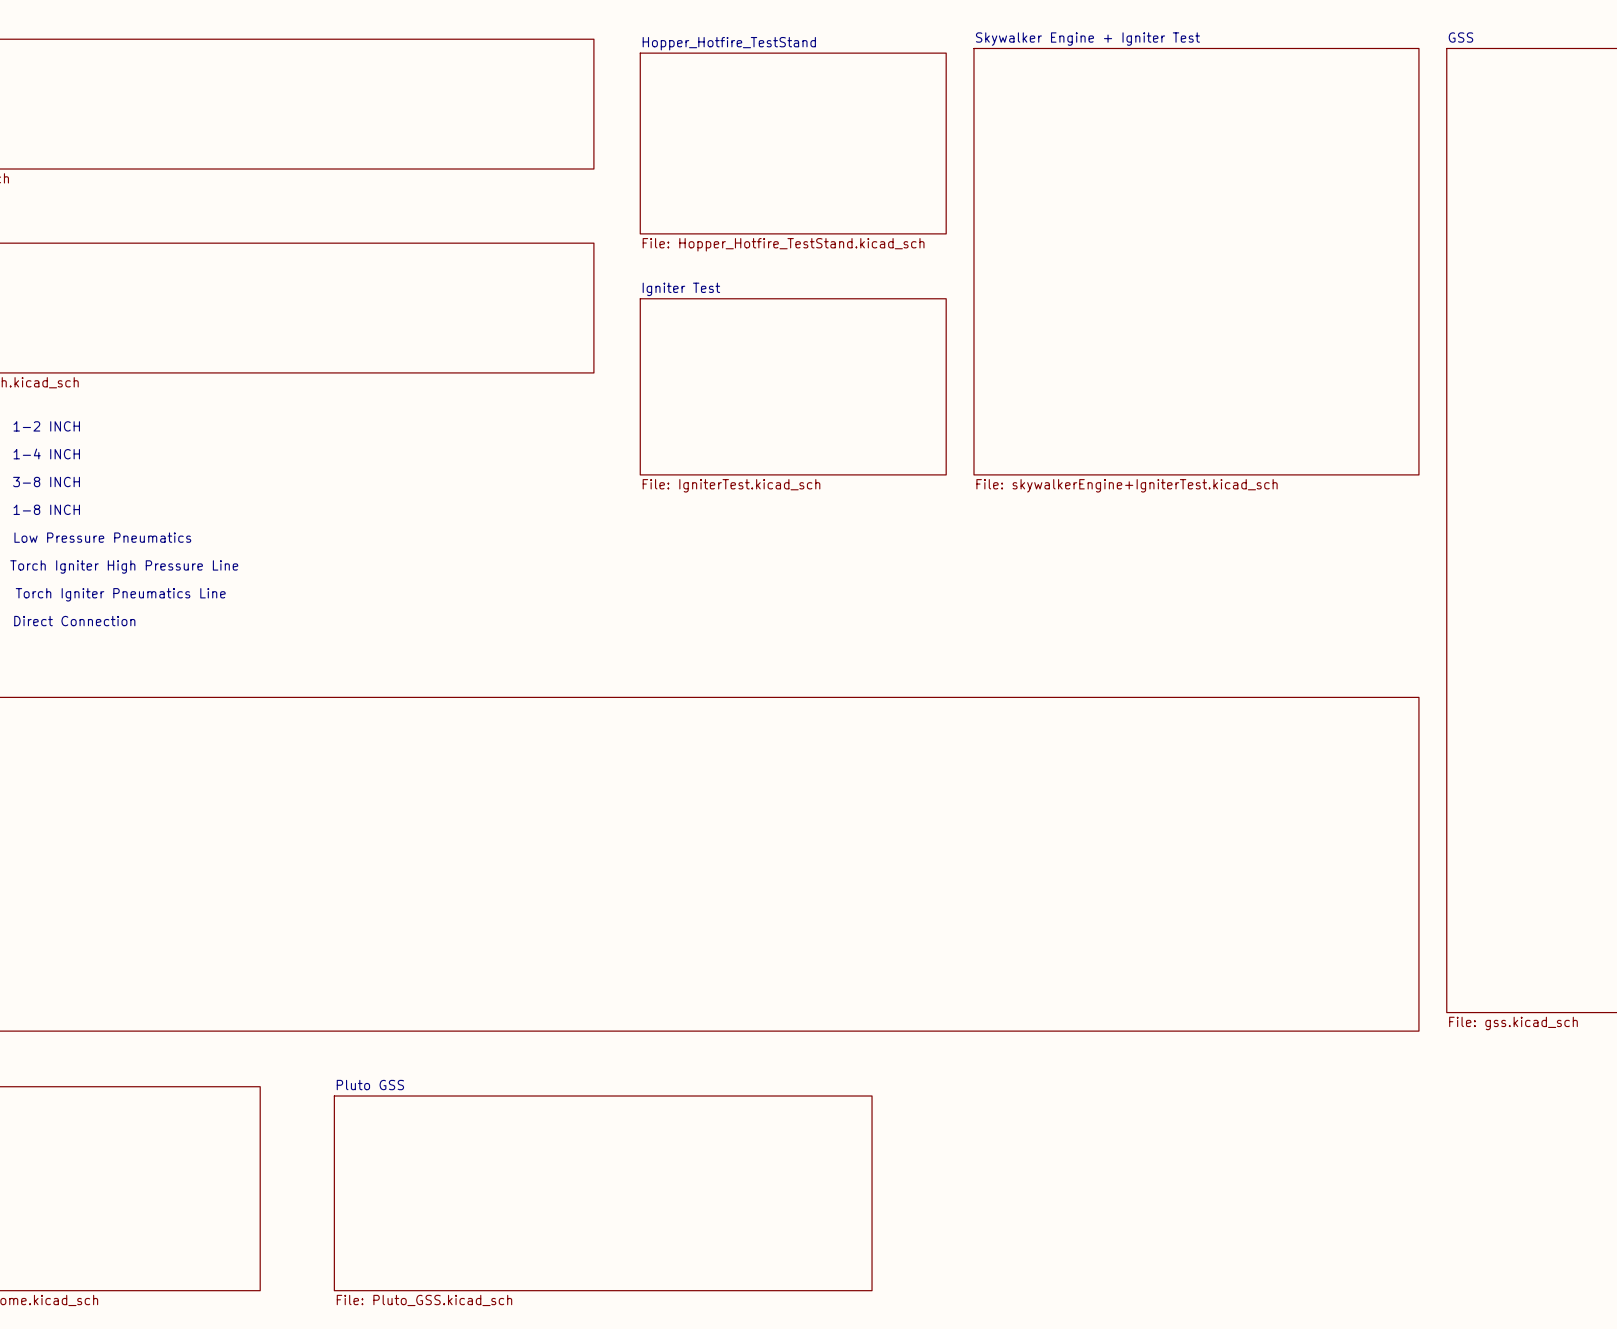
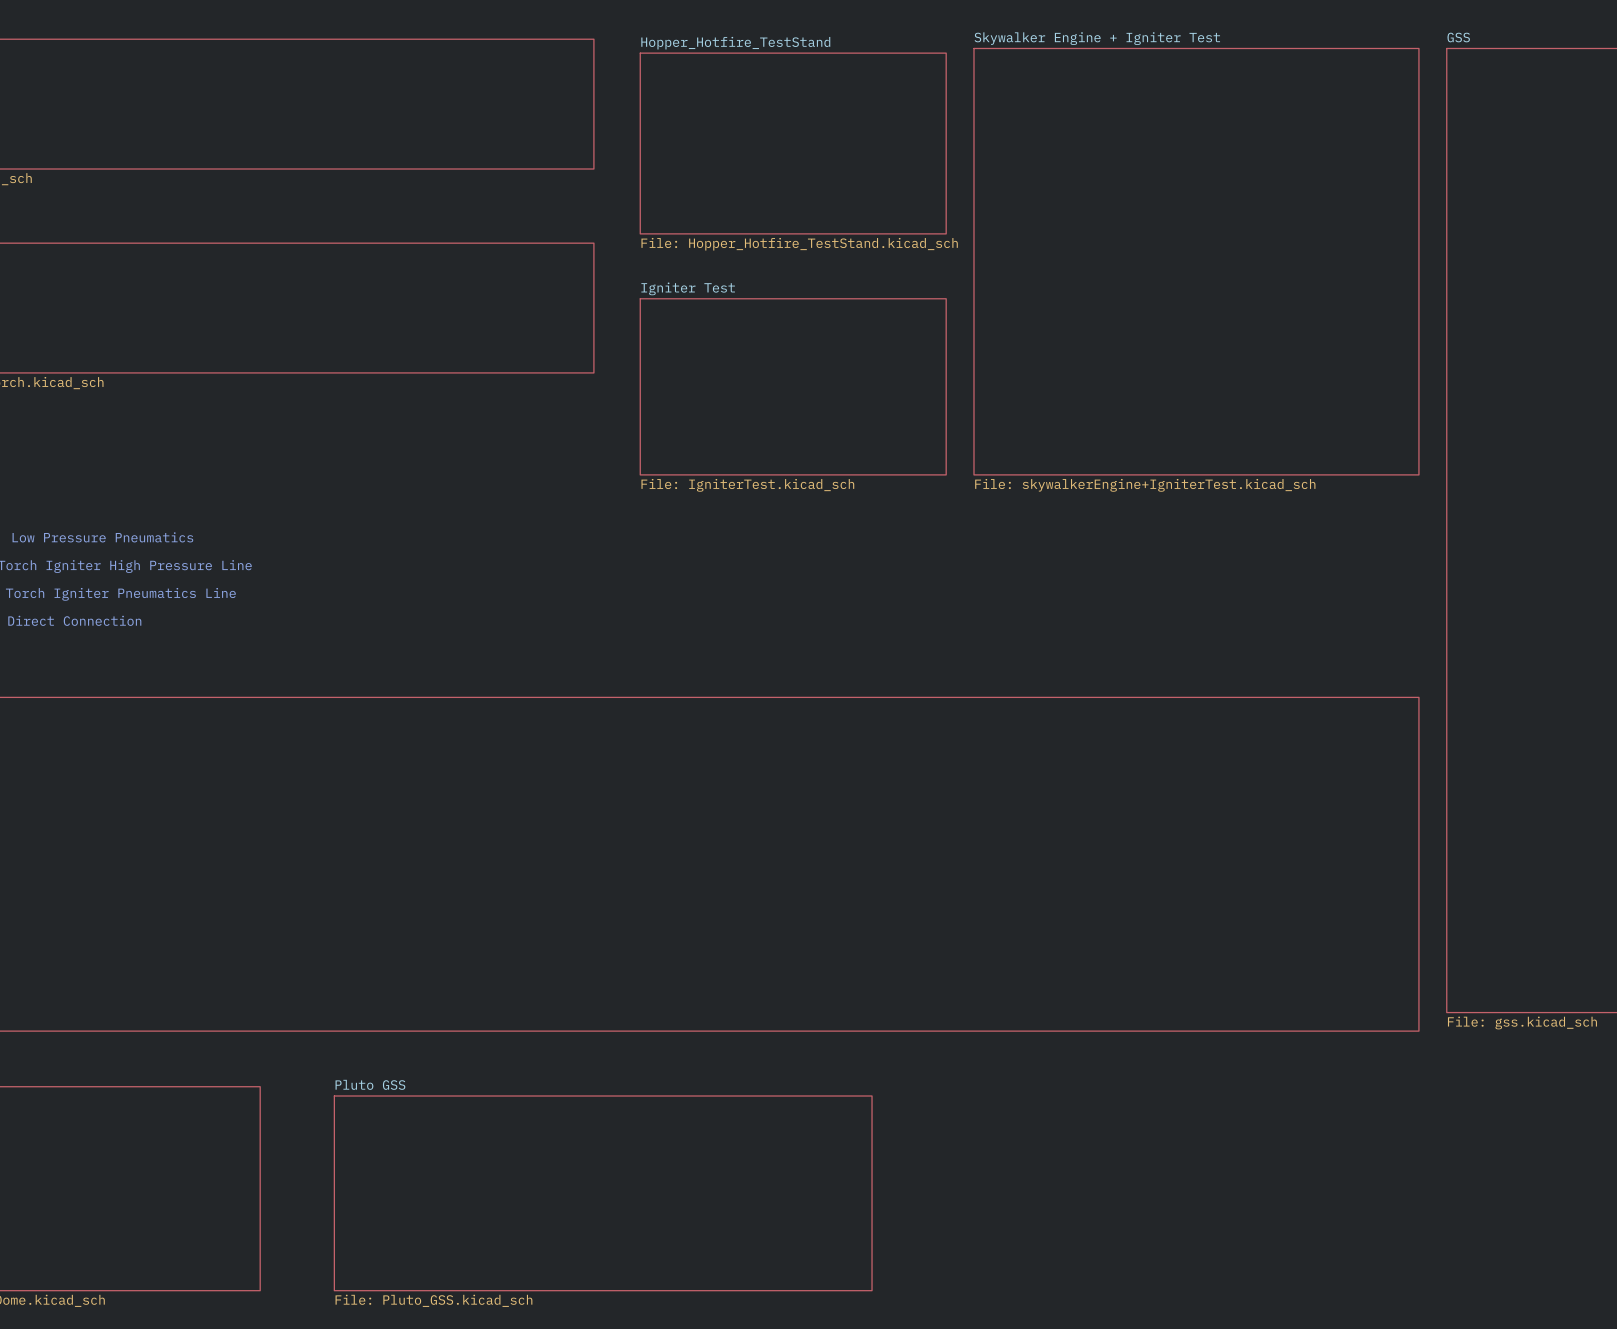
text: 1-2 INCH (46, 426) -> none
text: 1-4 INCH (46, 453) -> none
text: 3-8 INCH (46, 482) -> none
text: 1-8 INCH (46, 509) -> none

